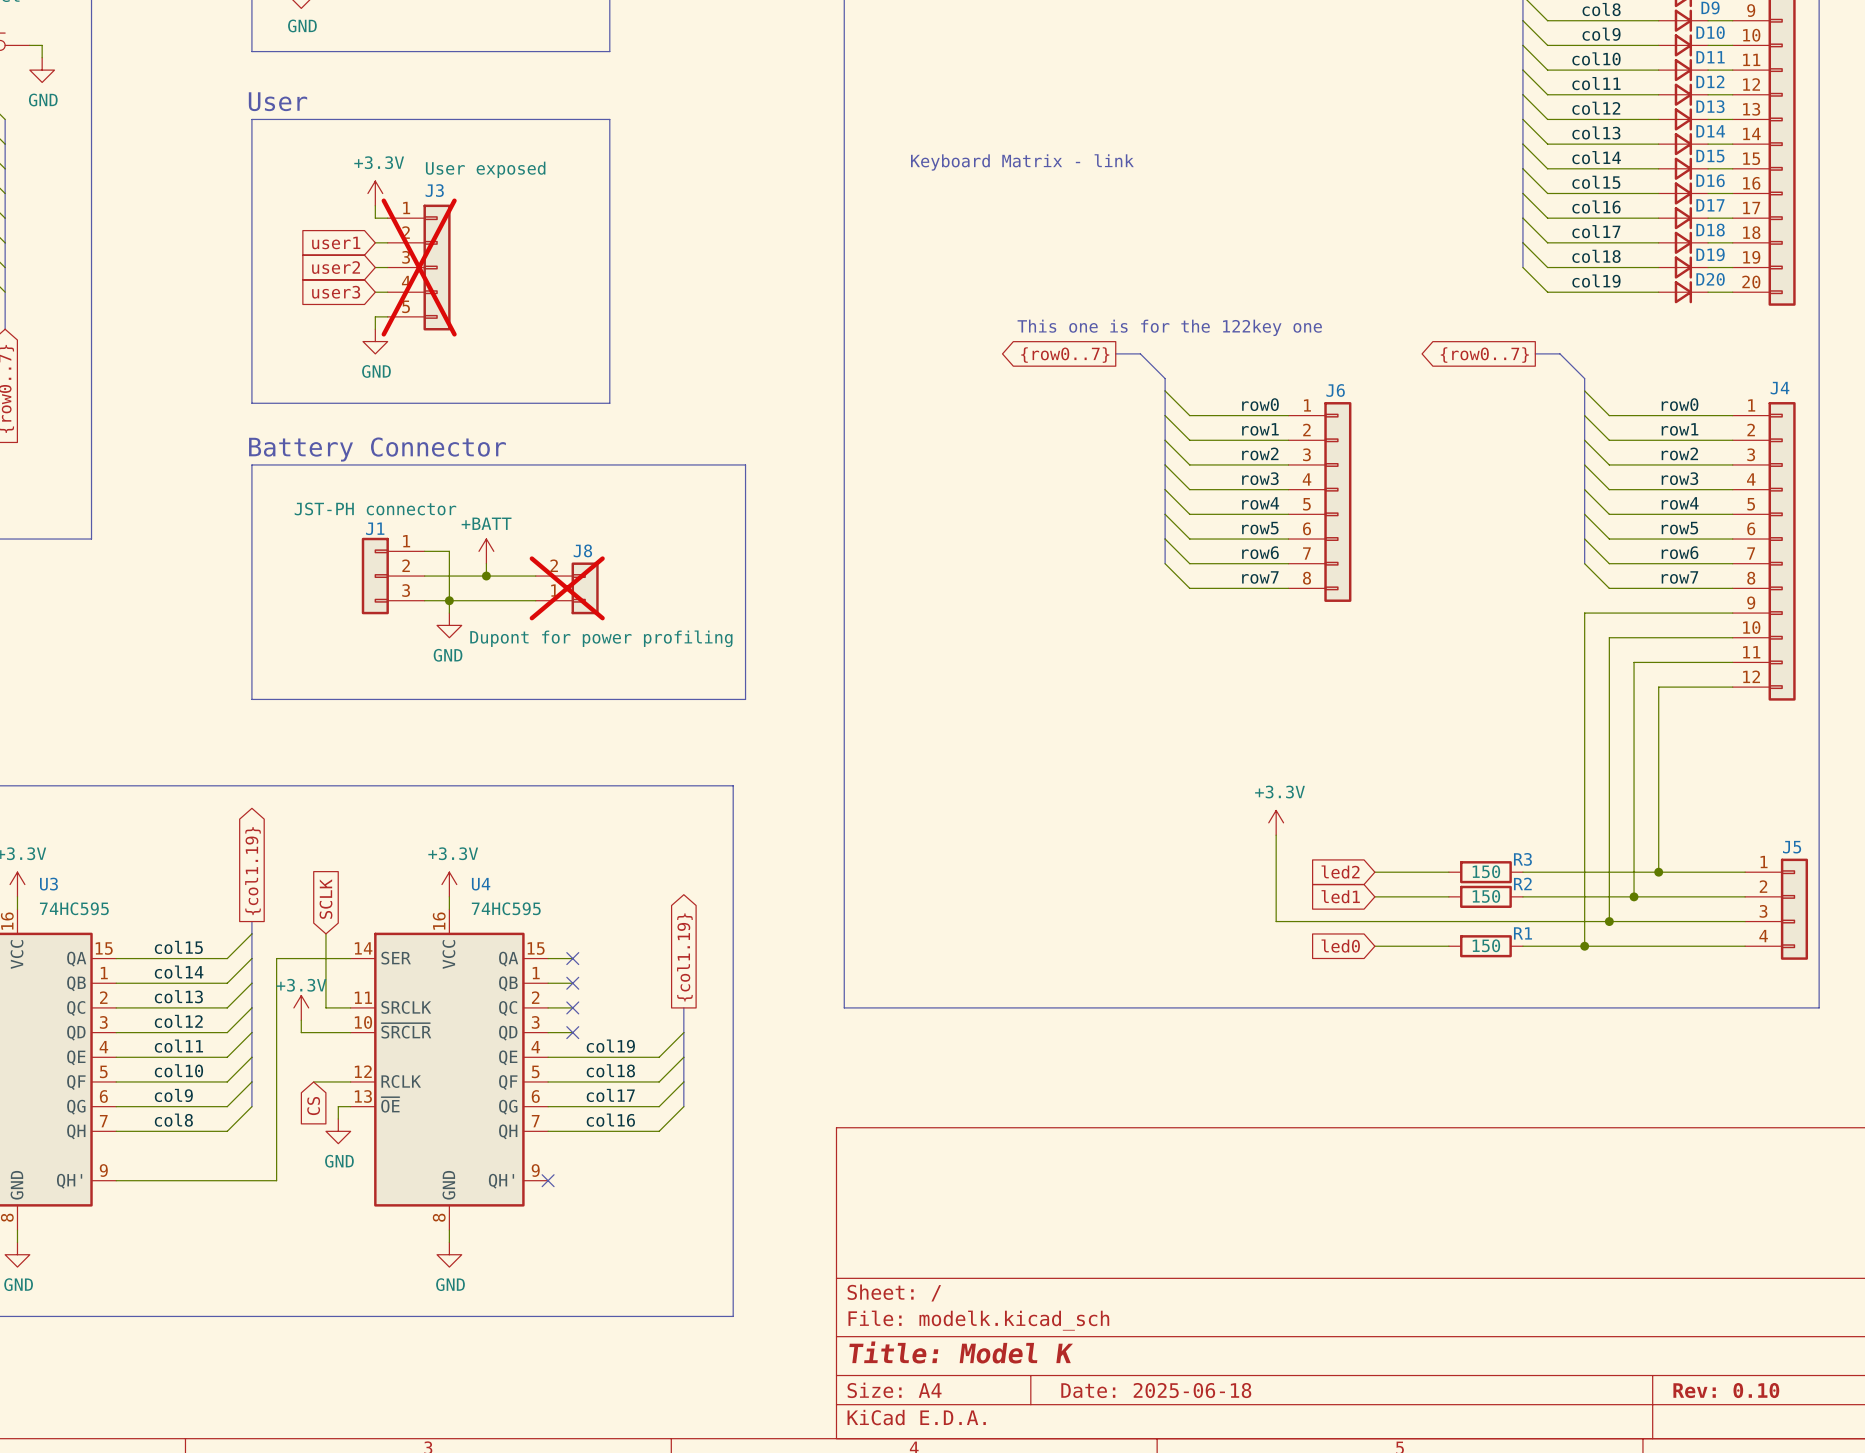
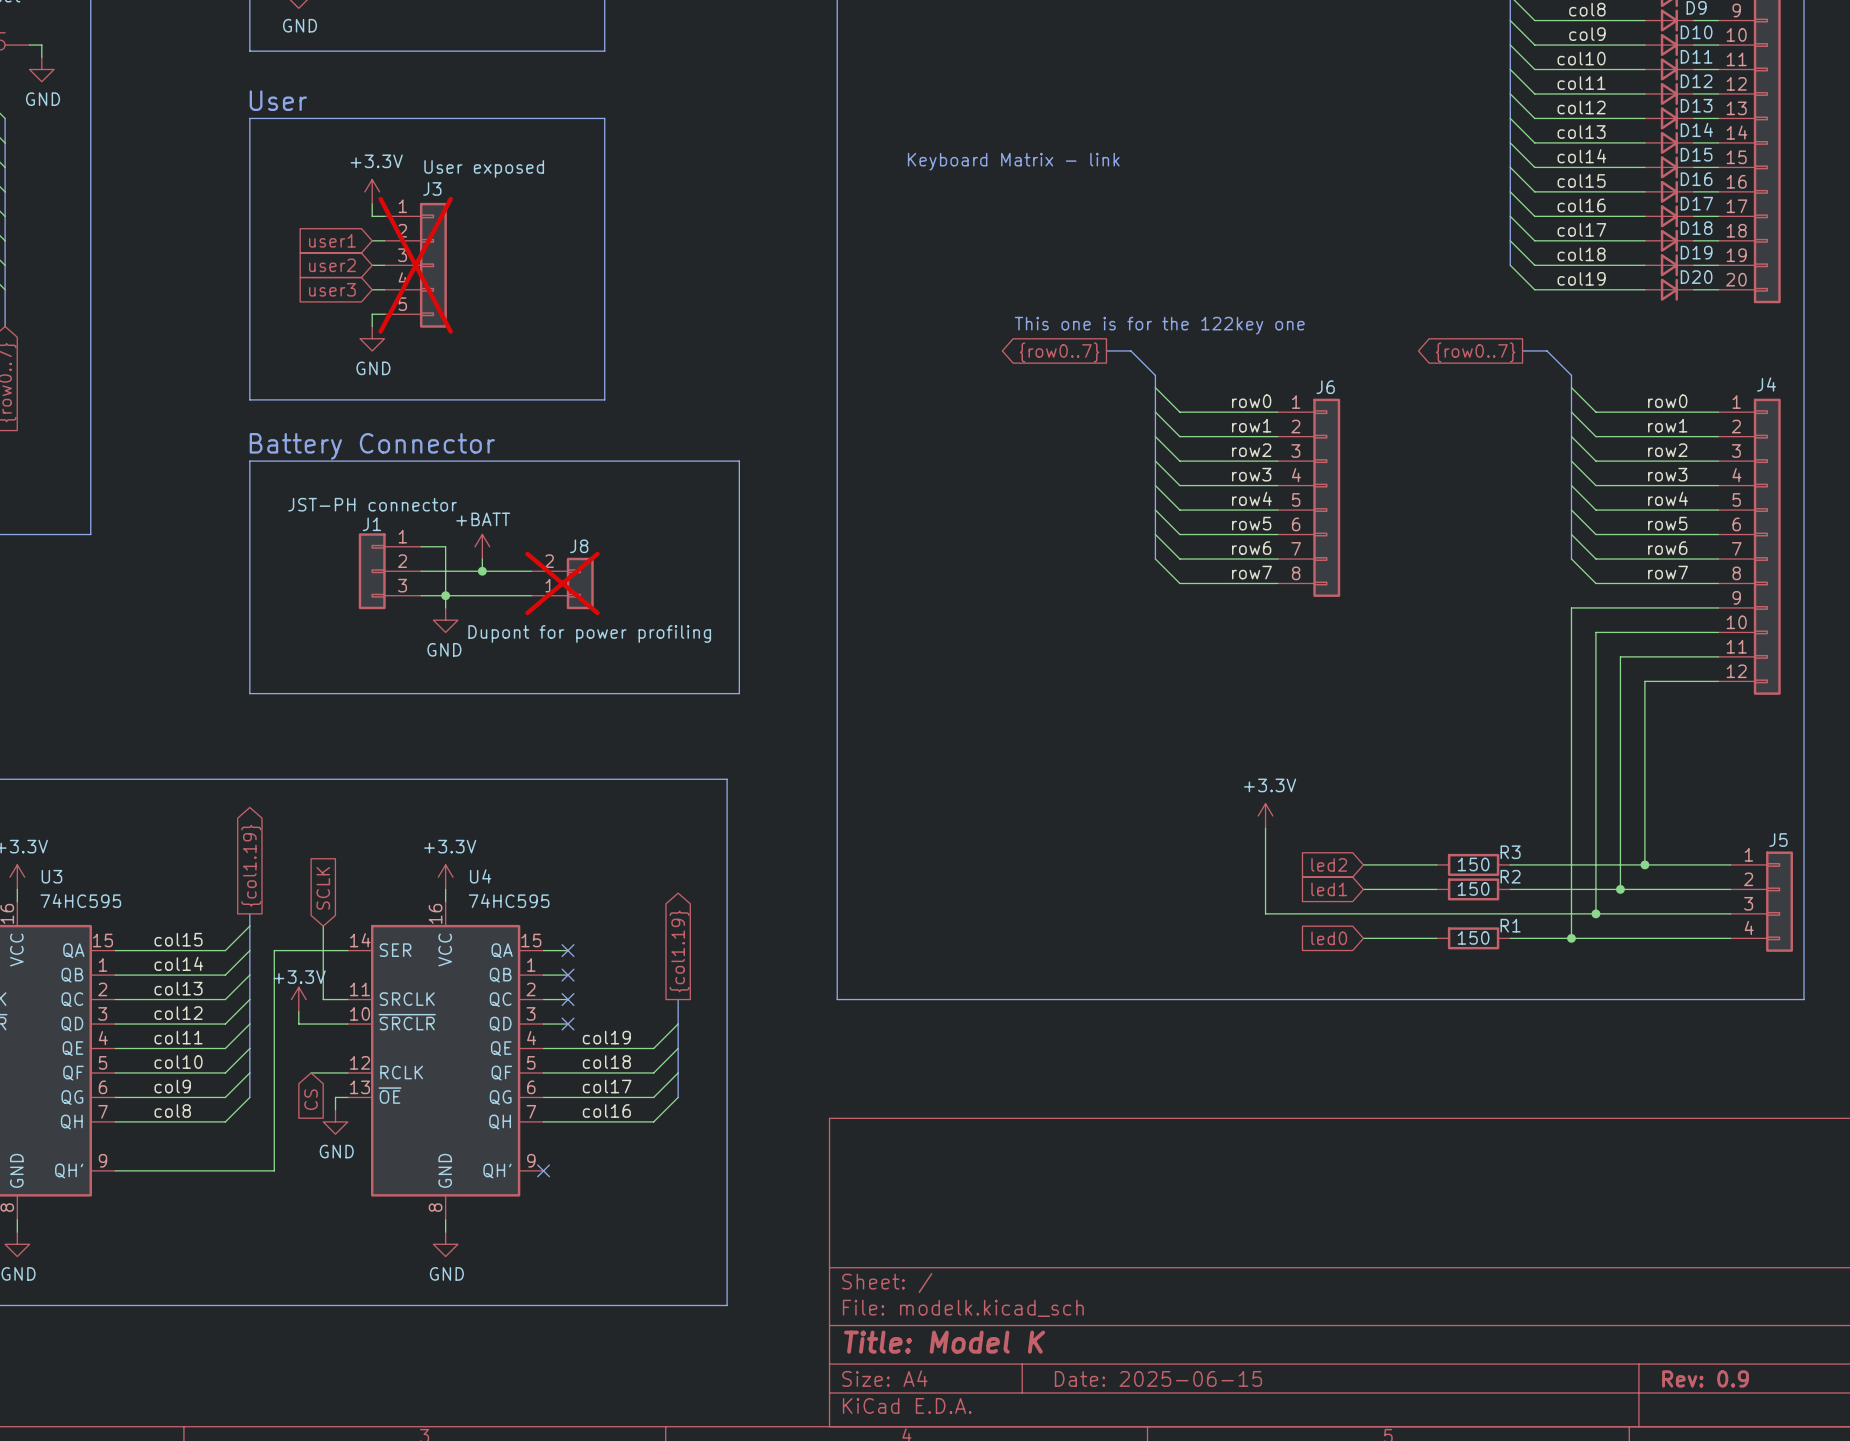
title block: Date: 2025-06-18 (1156, 1390) -> Date: 2025-06-15 (1158, 1378)
title block: Rev: 0.10 (1726, 1390) -> Rev: 0.9 (1705, 1378)

